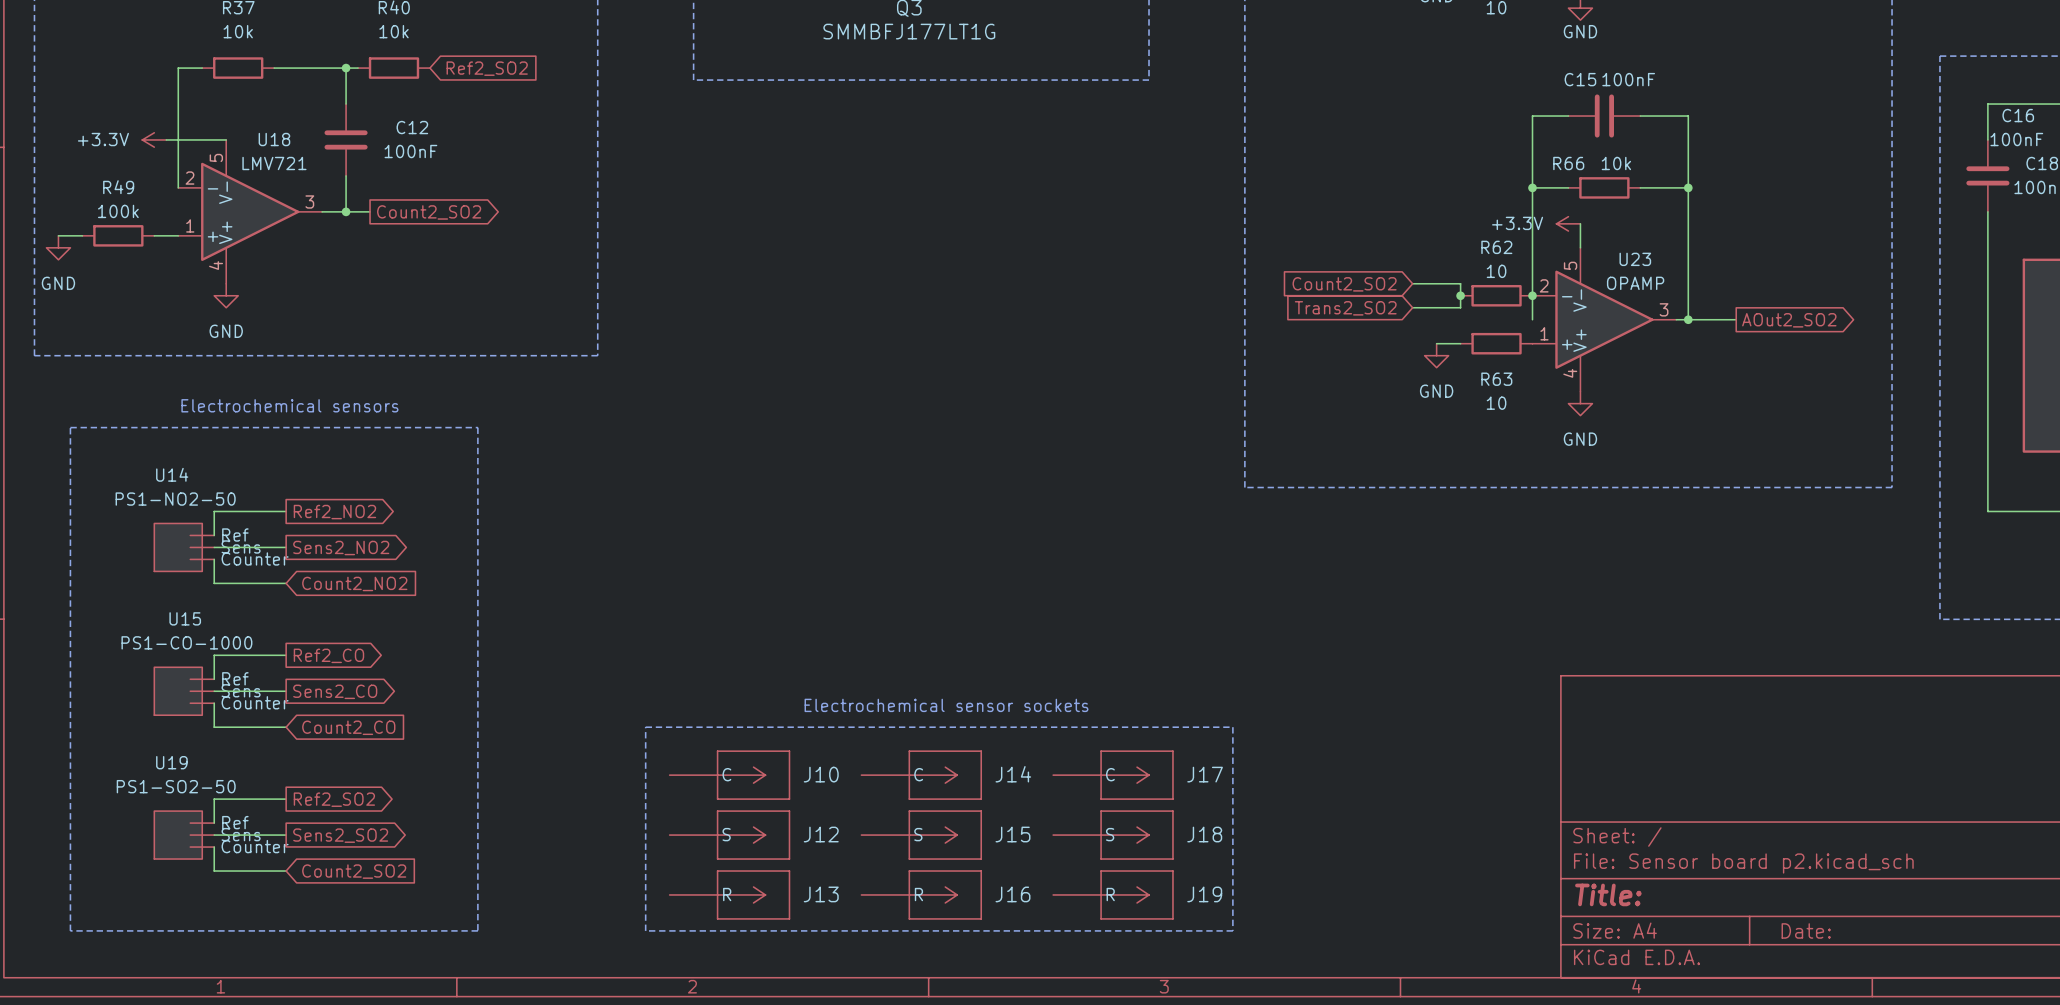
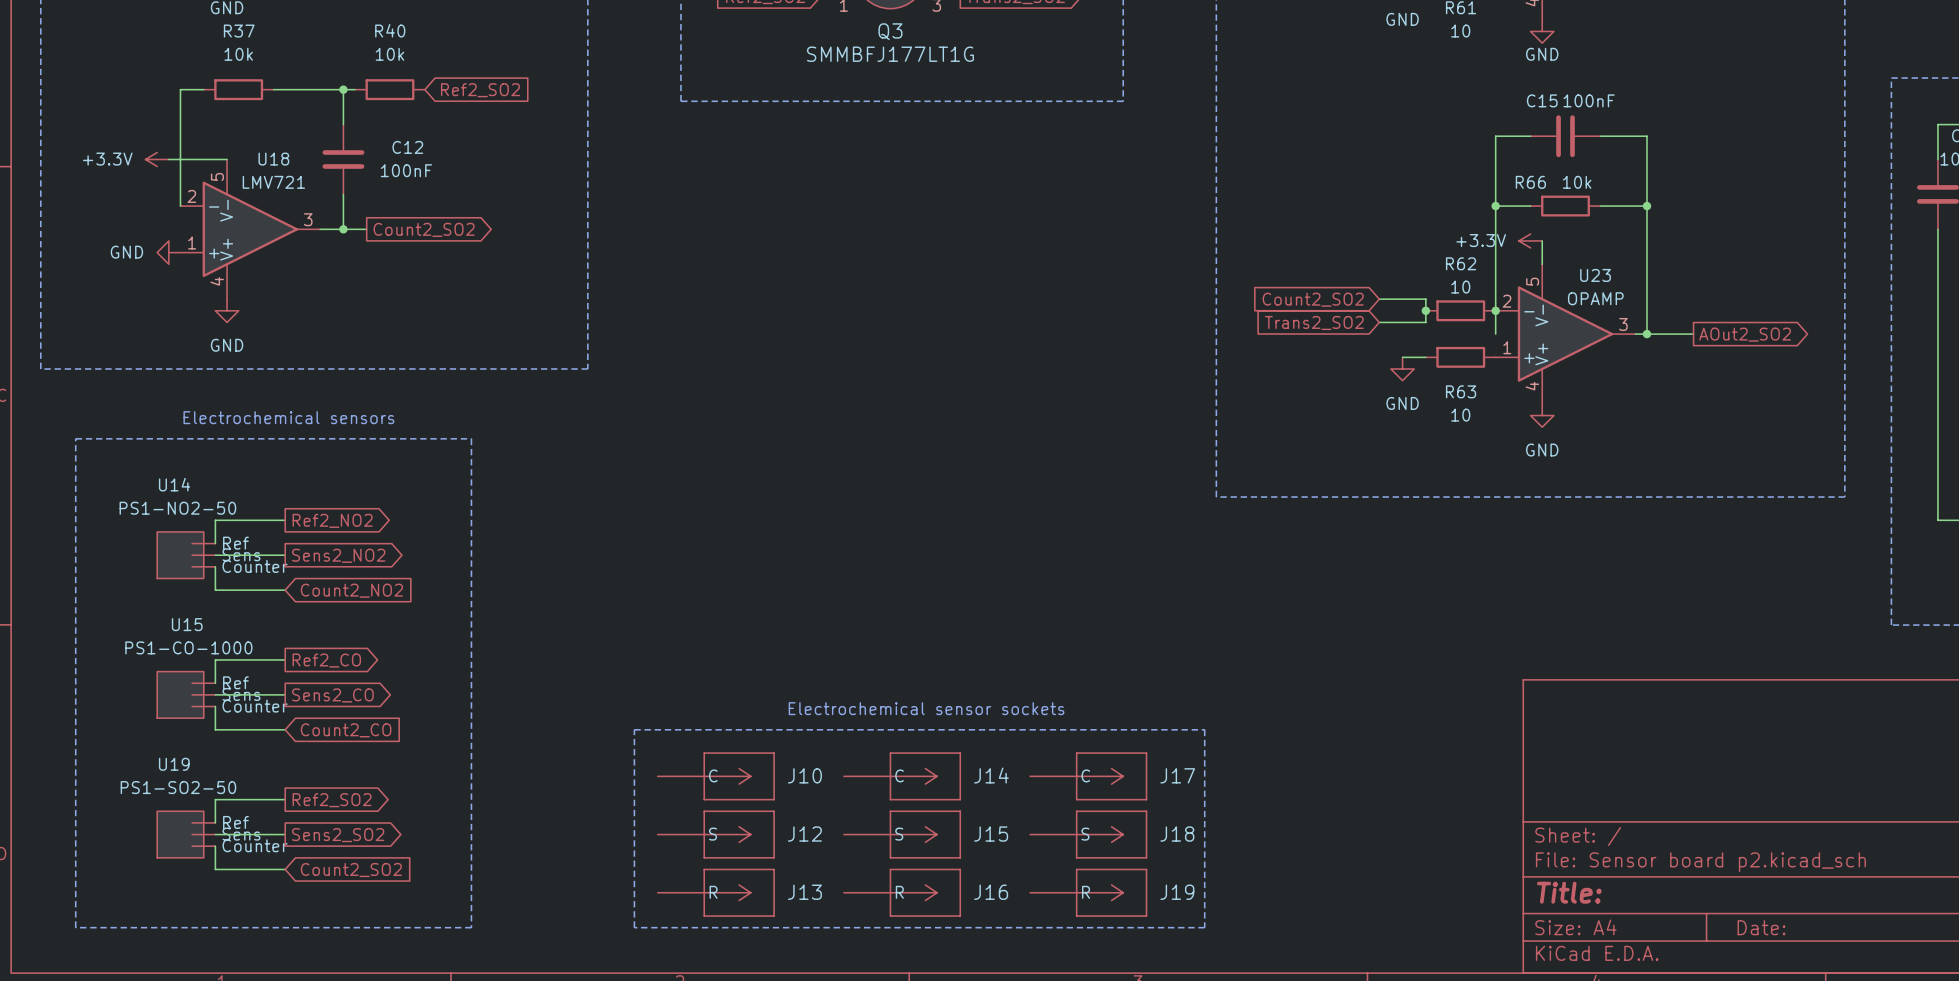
wire: (58, 235) (82, 235) -> none
R49: 100k (118, 235) -> none
power symbol rotation: 0° (58, 247) -> 90° clockwise (168, 252)
power symbol position: GND (58, 247) -> GND (168, 252)

